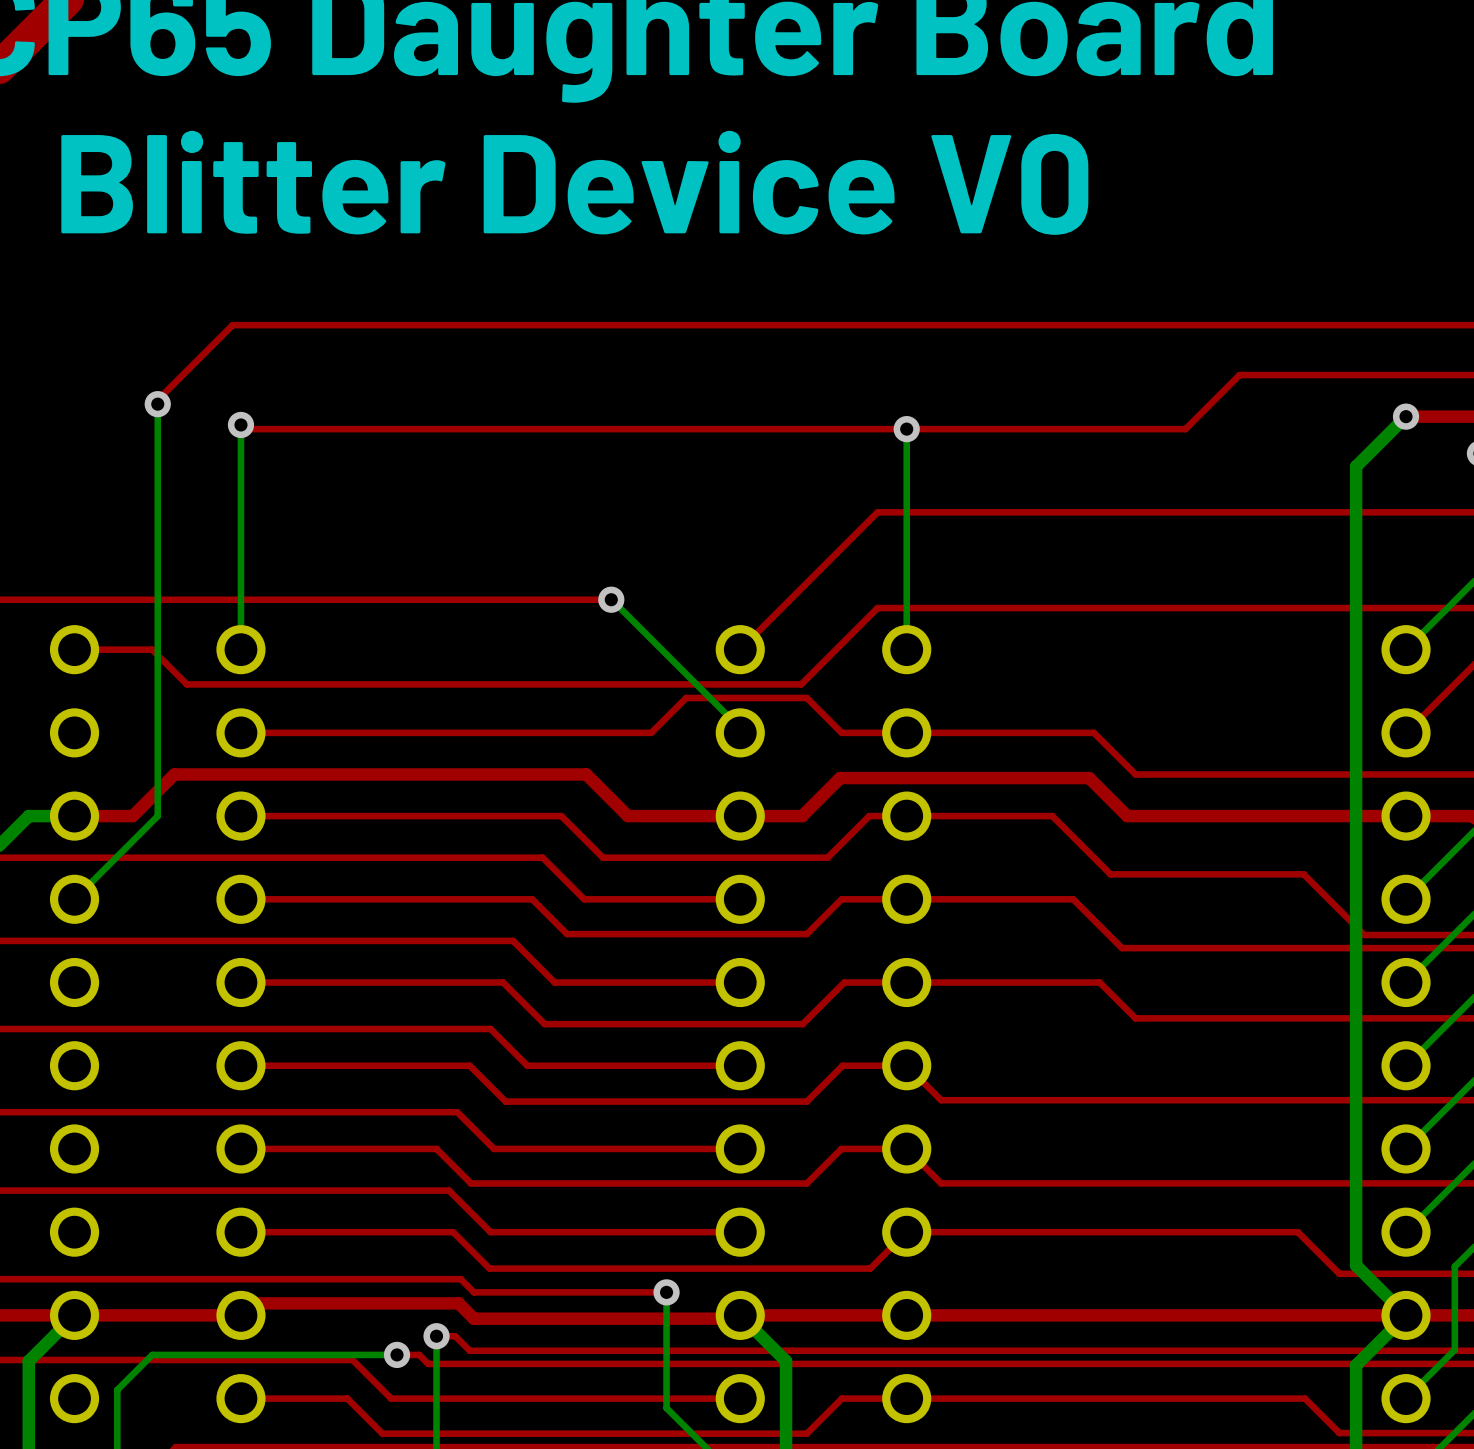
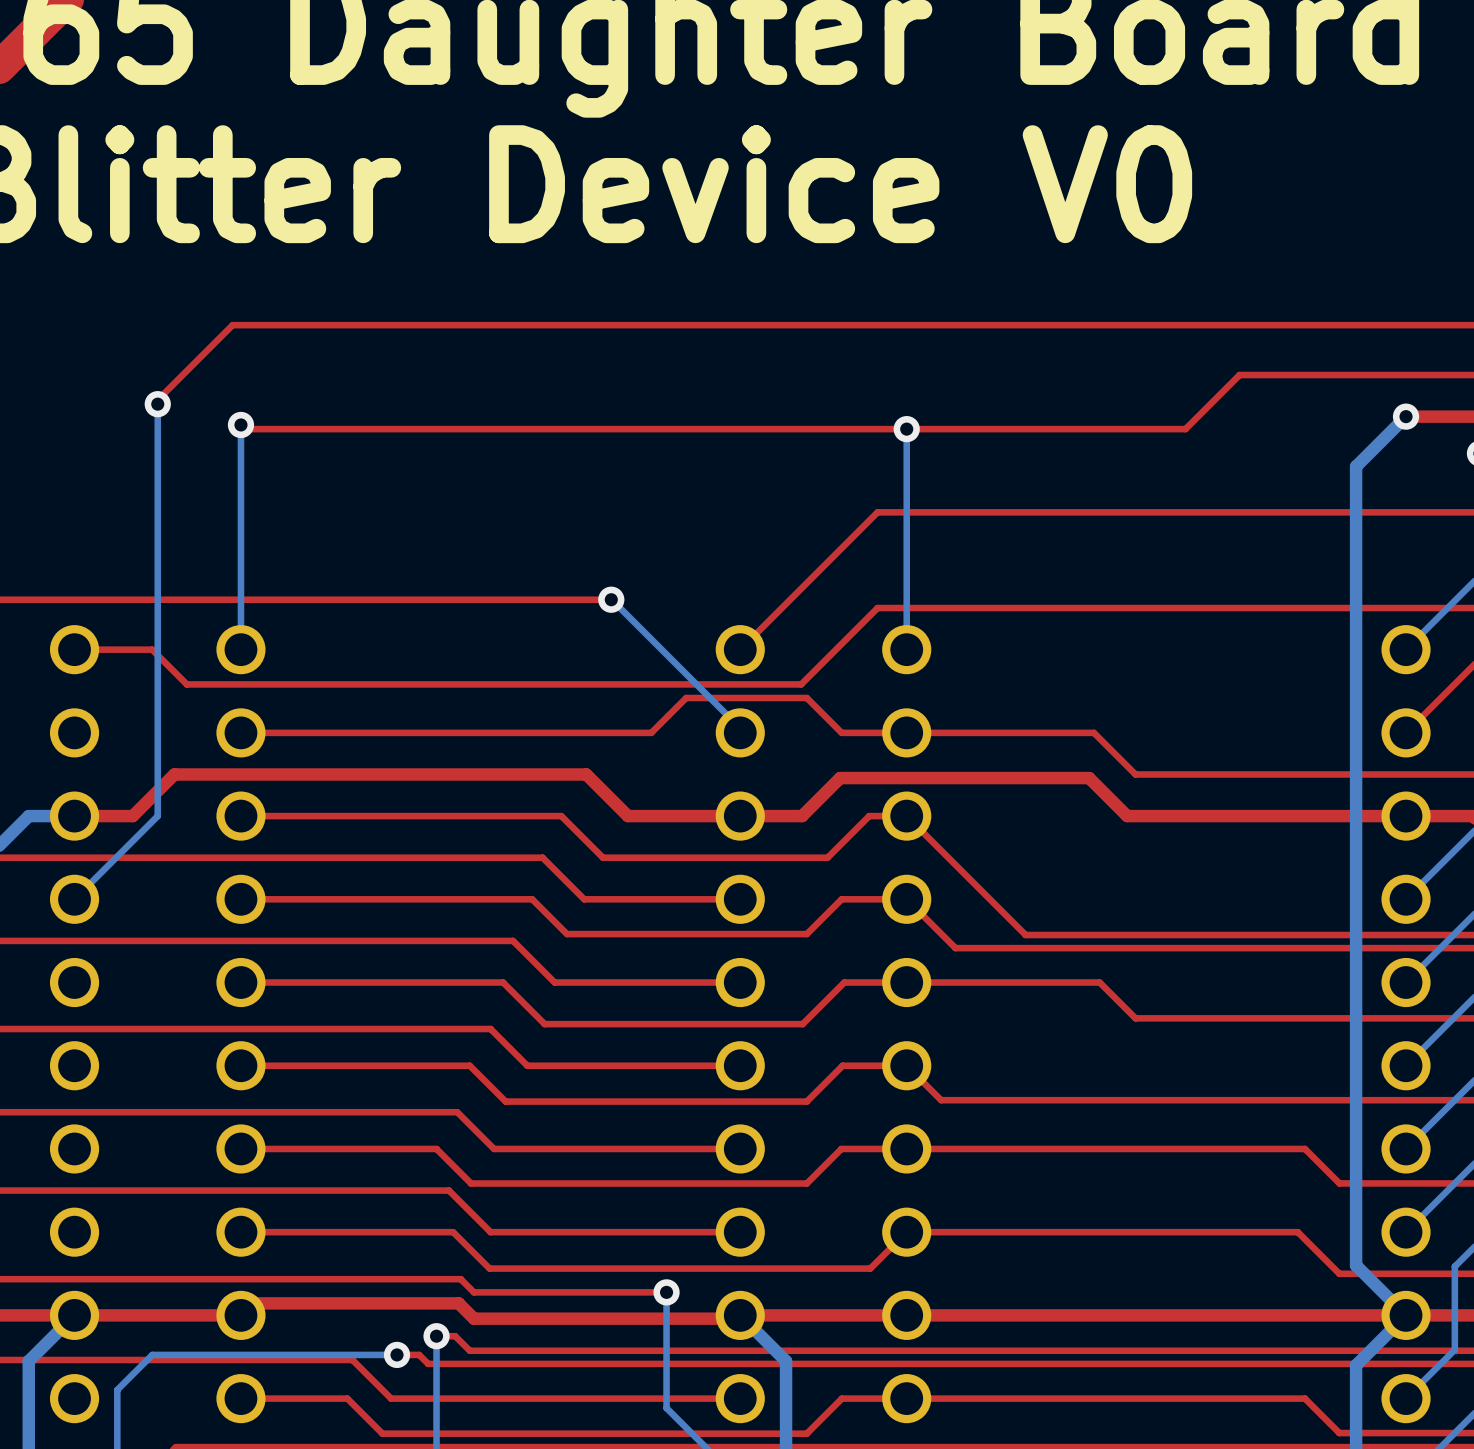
top track: (906, 816) (1052, 816) (1110, 874) (1303, 874) (1364, 935) -> (906, 816) (1025, 935) (1364, 935)
top track: (906, 899) (1073, 899) (1121, 948) -> (906, 899) (955, 948) (1121, 948)
top track: (906, 1148) (941, 1183) (1339, 1183) -> (906, 1148) (1304, 1148) (1339, 1183)

